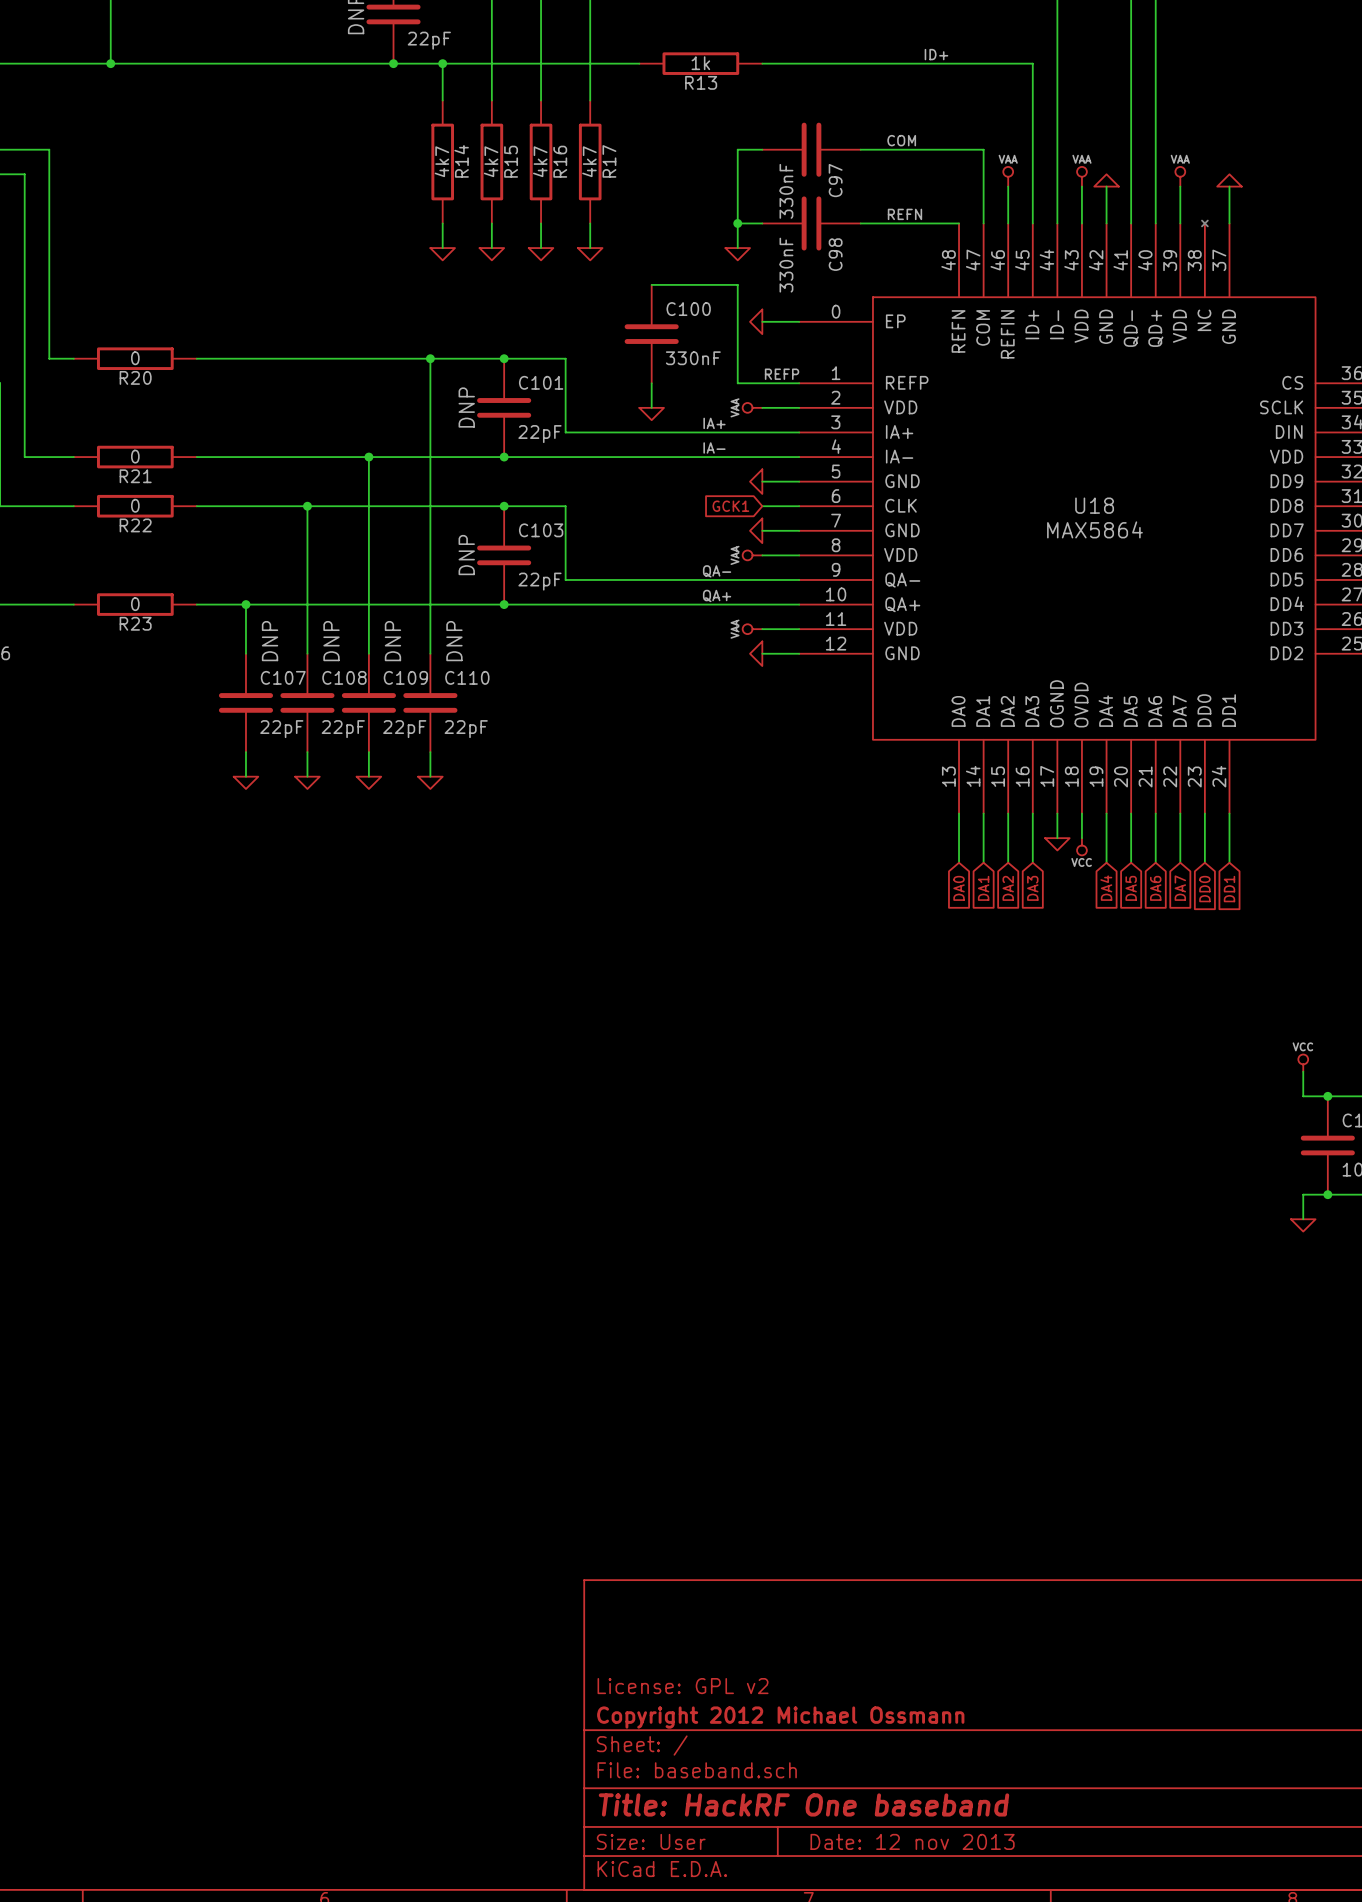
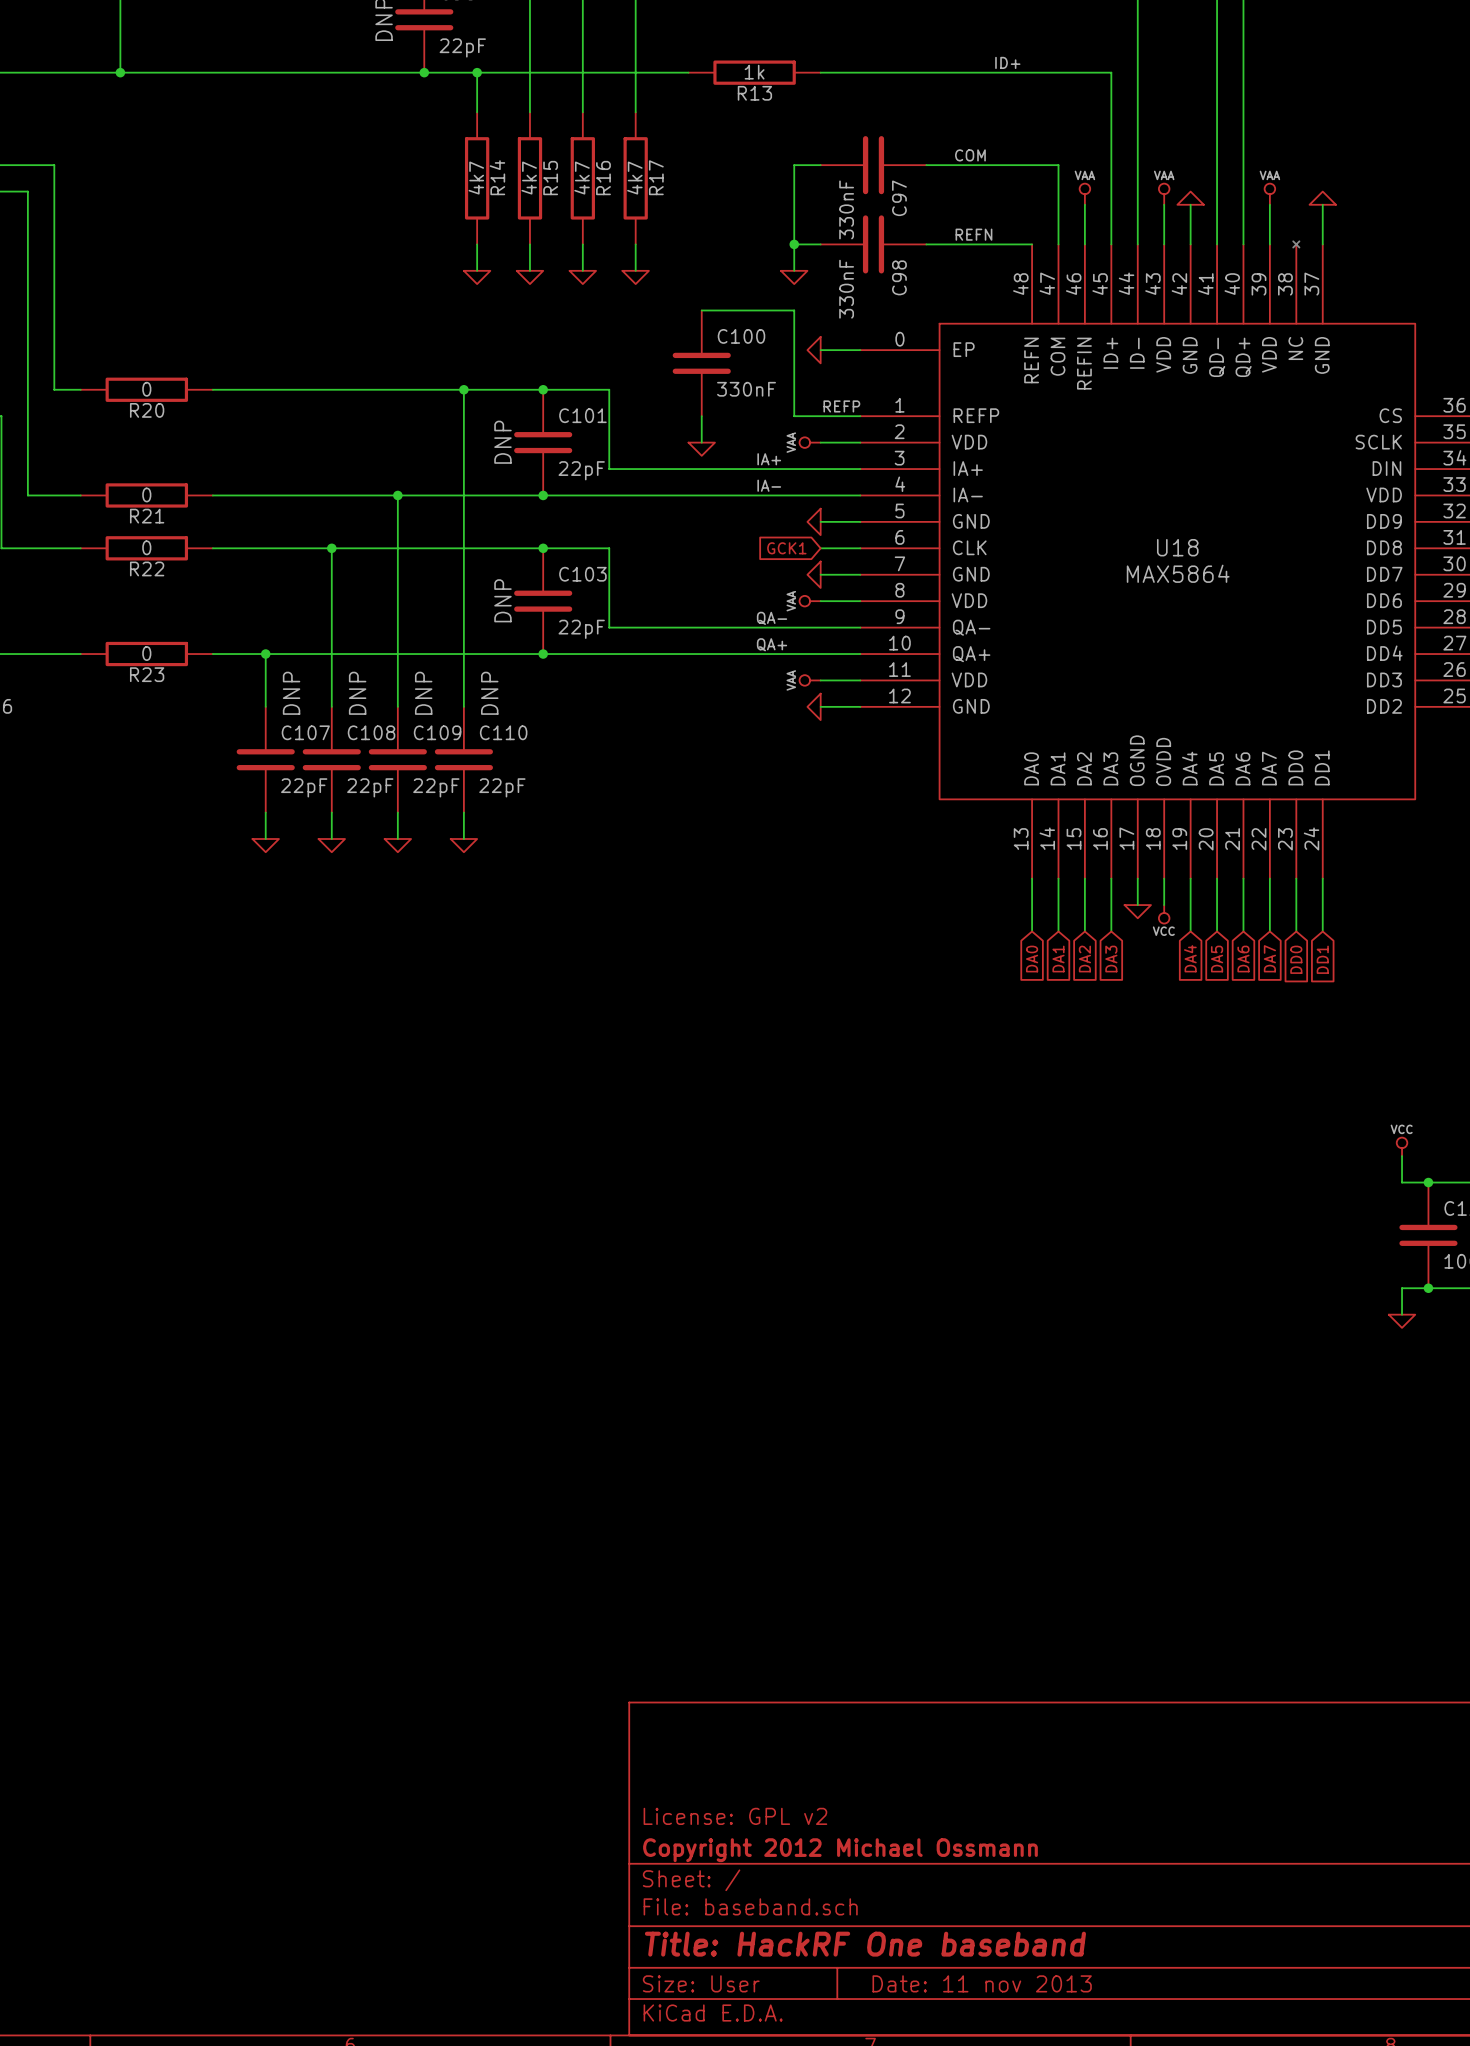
title block: Date: 12 nov 2013 (912, 1841) -> Date: 11 nov 2013 (982, 1983)

